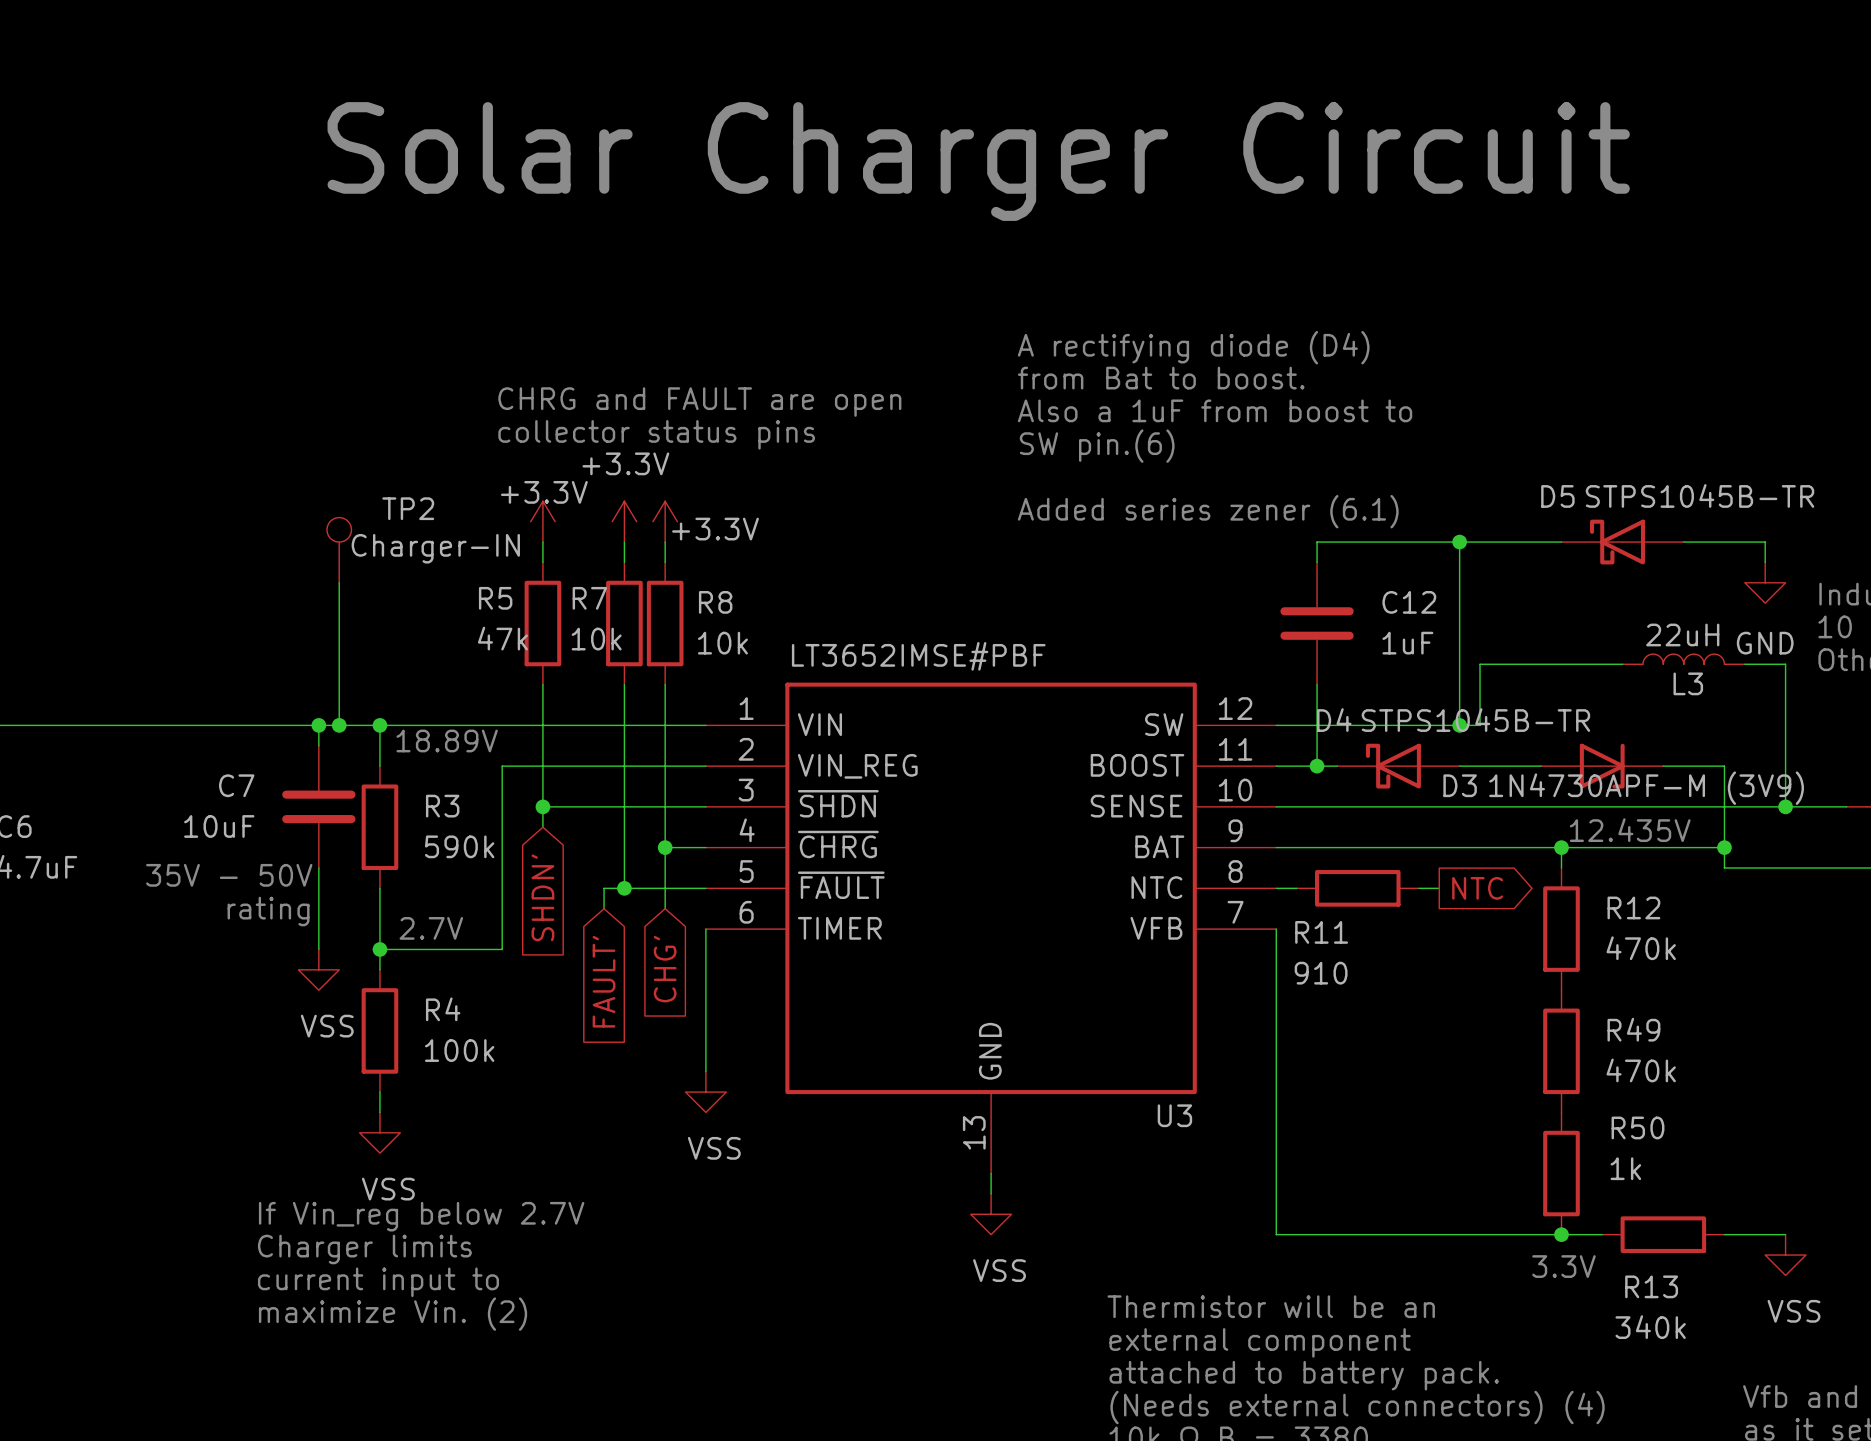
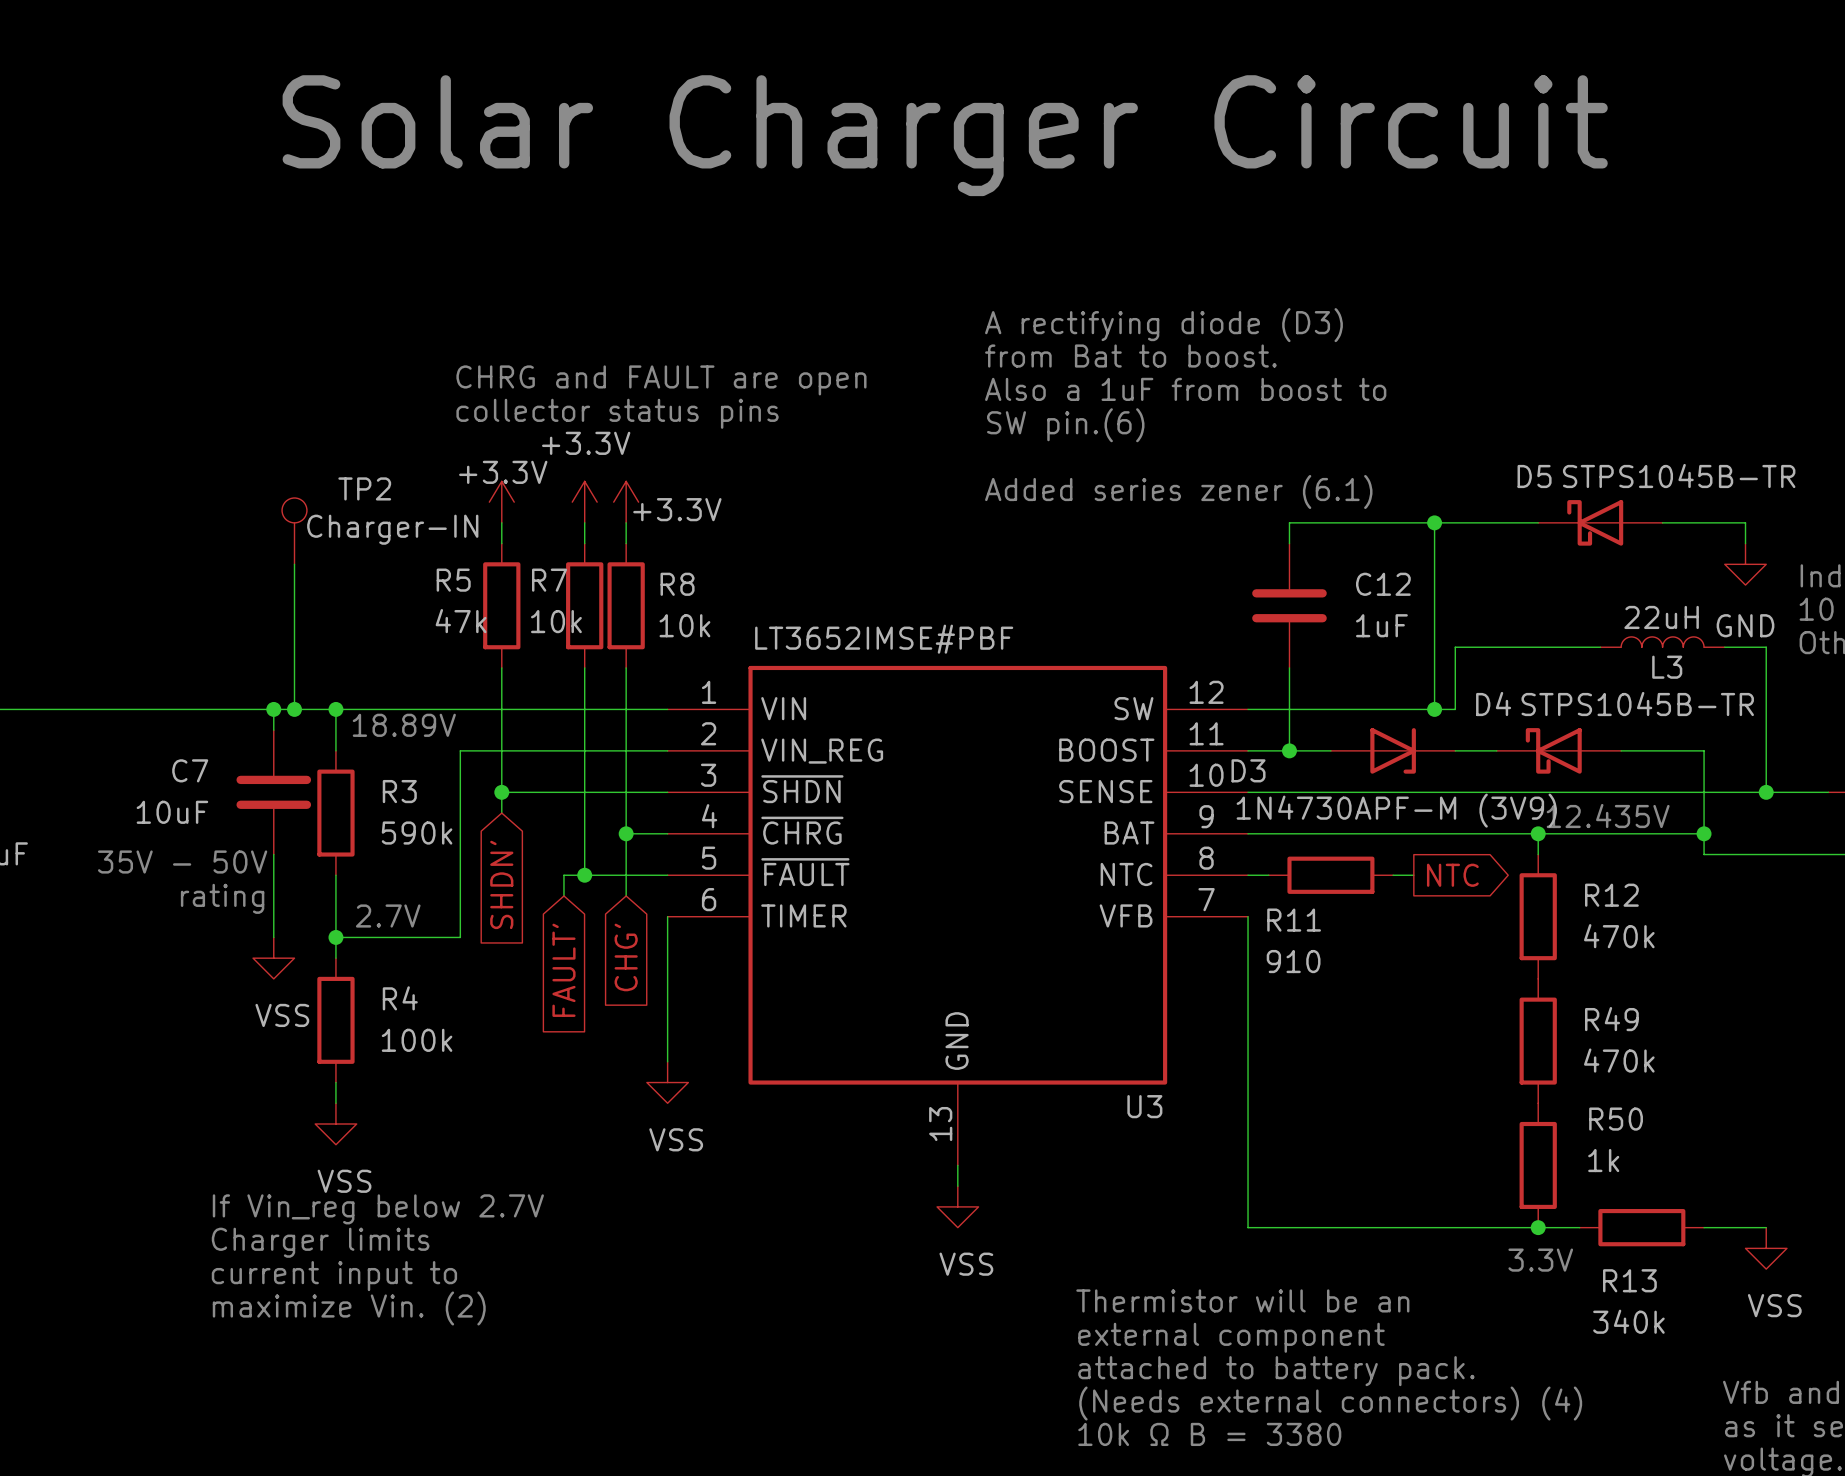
text: A rectifying diode (D4) (1193, 347) -> A rectifying diode (D3) (1163, 325)
D4 position: (1398, 766) -> (1558, 750)
D3 position: (1602, 766) -> (1393, 750)
D3 value position: 1N4730APF-M (3V9) (1646, 788) -> 1N4730APF-M (3V9) (1396, 810)

